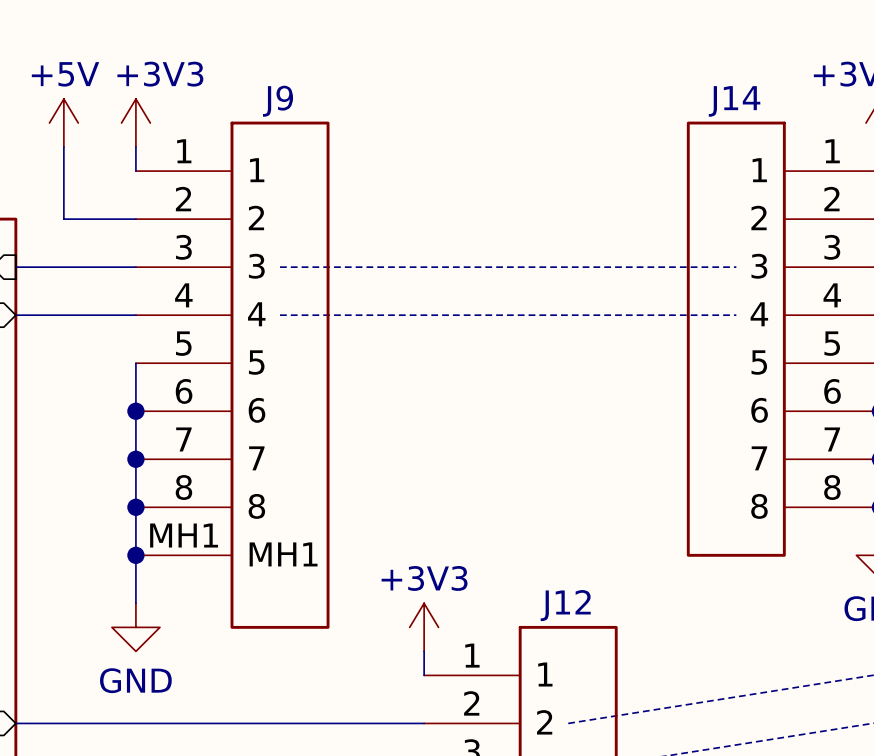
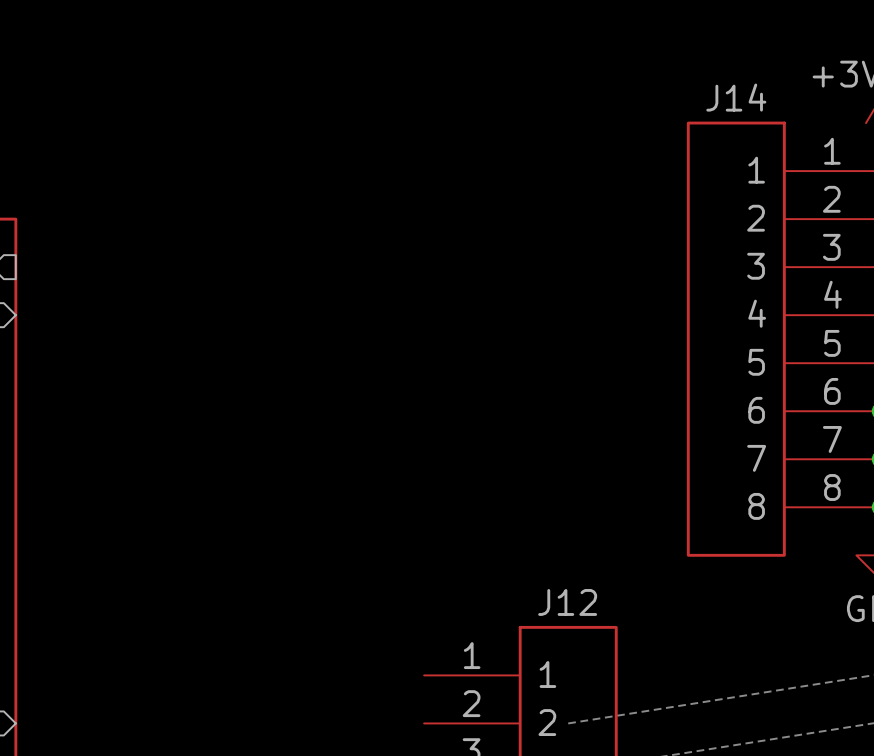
power symbol: +5V (63, 123) -> none
power symbol: +3V3 (135, 123) -> none
wire: (63, 147) (63, 219) (135, 219) -> none
wire: (135, 147) (135, 171) -> none
wire: (15, 267) (135, 267) -> none
line: (280, 267) (736, 267) -> none
wire: (15, 315) (135, 315) -> none
line: (280, 315) (736, 315) -> none
wire: (135, 363) (135, 603) -> none
J9: (232, 375) -> none
junction: (135, 411) -> none
junction: (135, 459) -> none
junction: (135, 507) -> none
junction: (135, 555) -> none
power symbol: GND (135, 627) -> none
power symbol: +3V3 (424, 627) -> none
wire: (424, 651) (424, 675) -> none
wire: (15, 723) (424, 723) -> none

